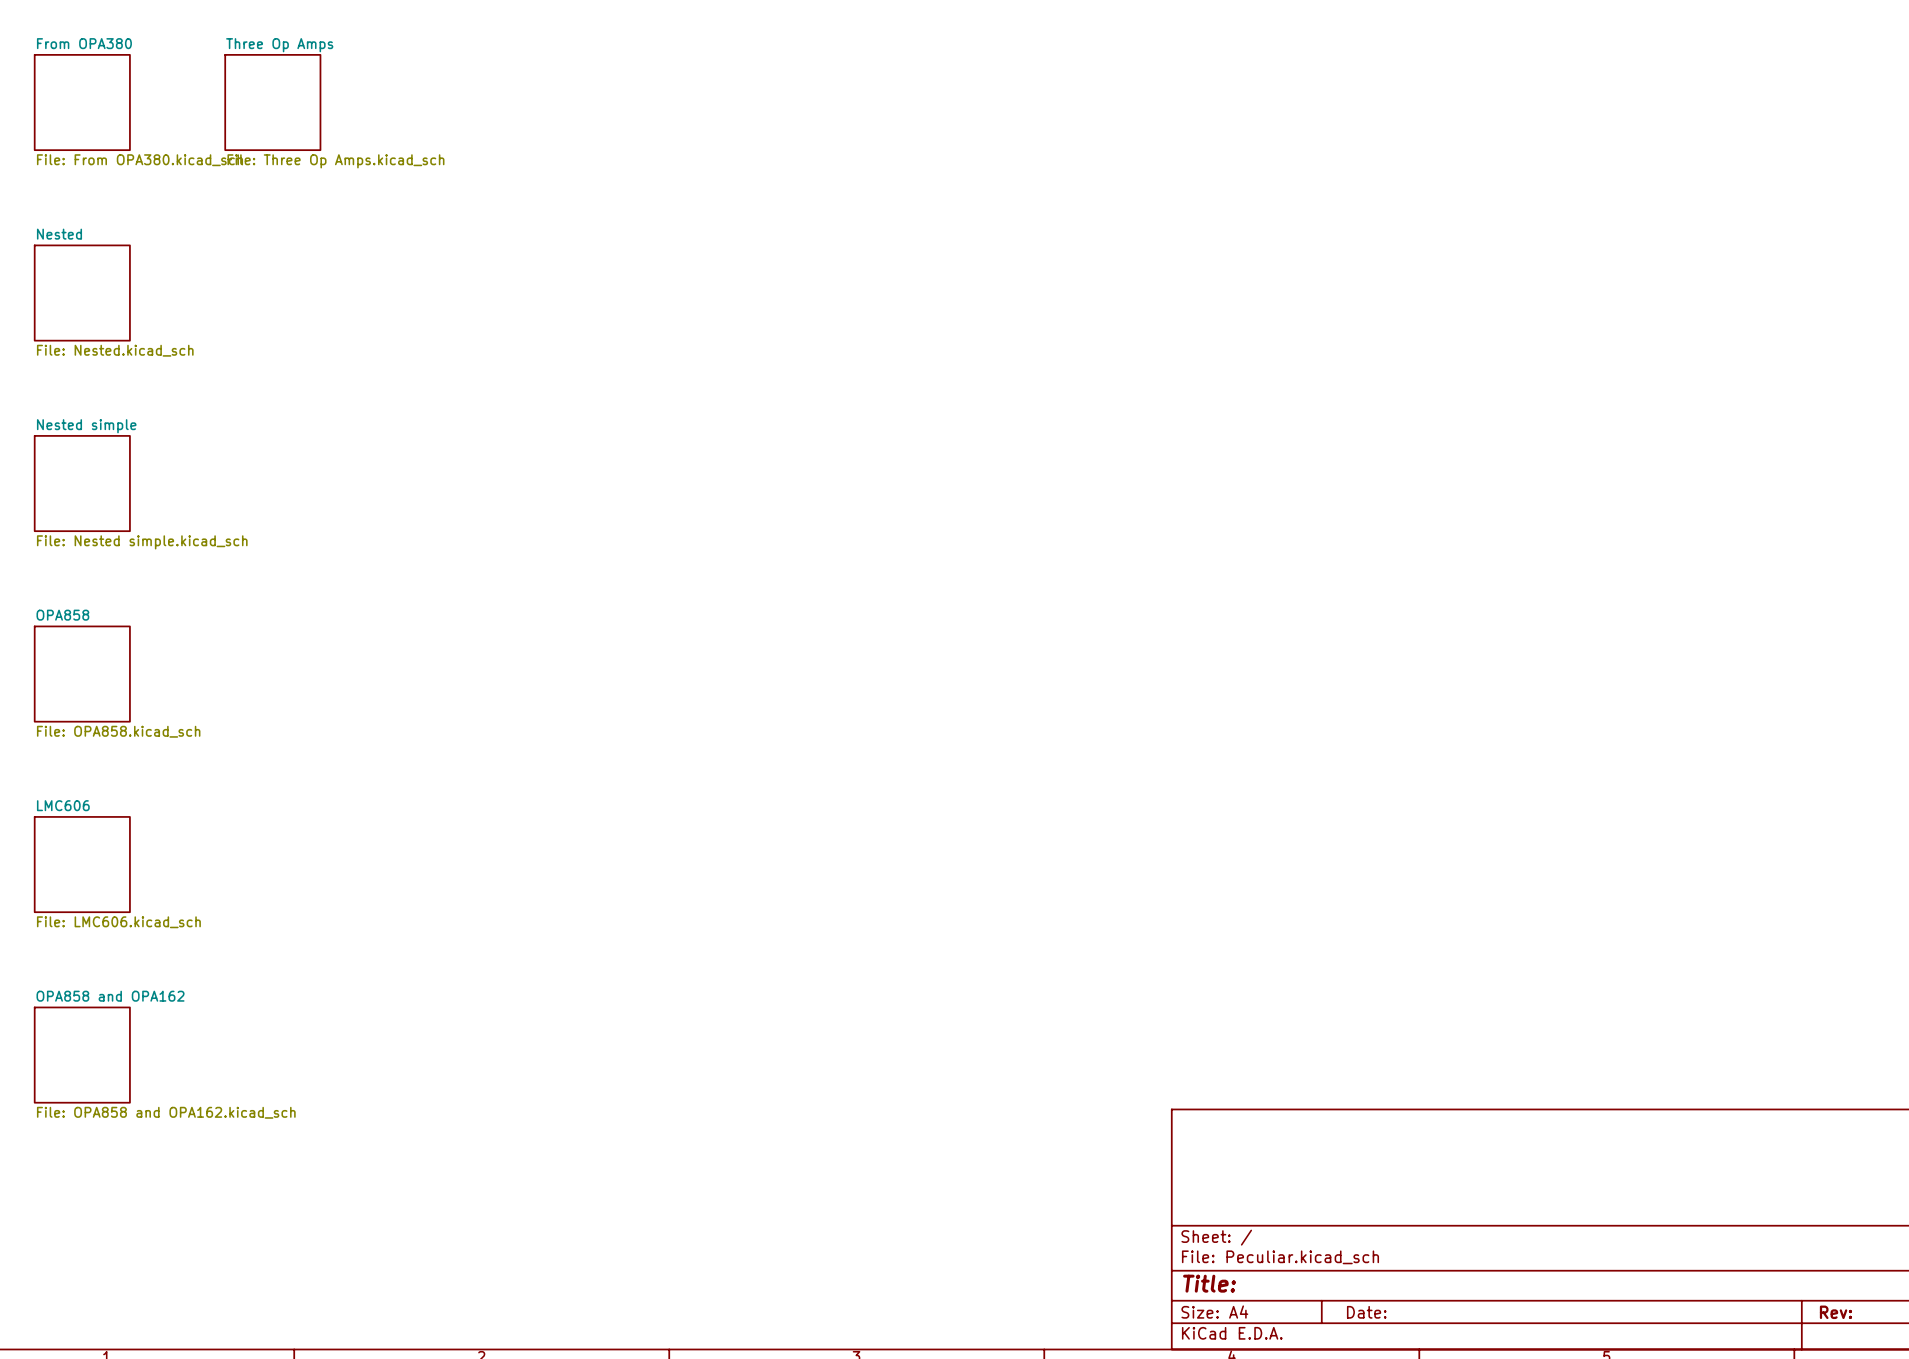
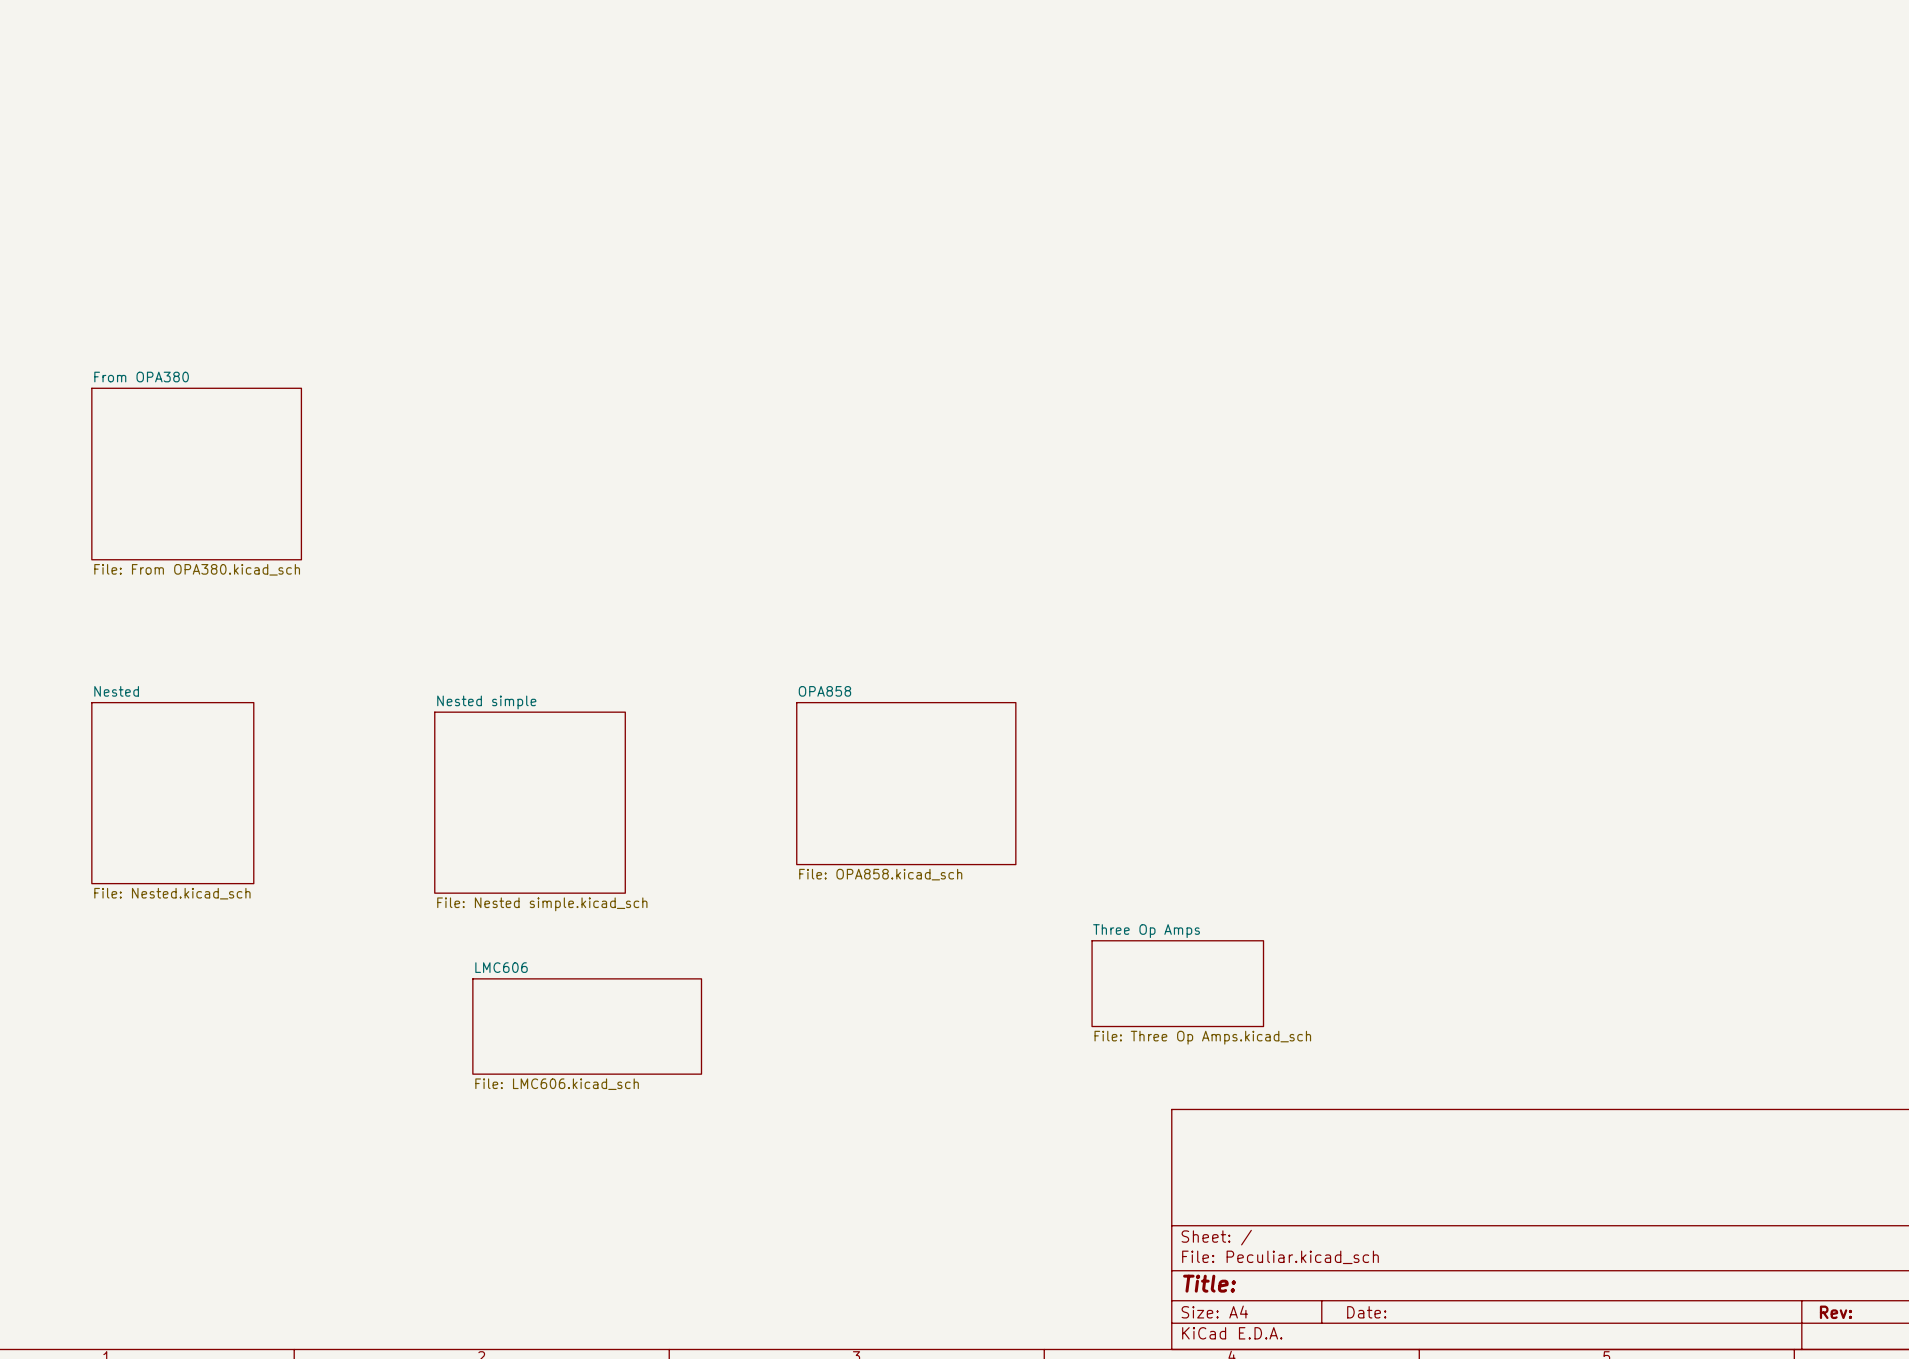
sheet From OPA380 name position: From OPA380 (84, 43) -> From OPA380 (141, 377)
sheet From OPA380 shape: [34, 54, 131, 151] -> [91, 387, 302, 561]
sheet Three Op Amps: File: Three Op Amps.kicad_sch (272, 102) -> none
sheet From OPA380 value position: File: From OPA380.kicad_sch (140, 160) -> File: From OPA380.kicad_sch (197, 569)
sheet Nested: File: Nested.kicad_sch (82, 293) -> none
sheet Nested simple: File: Nested simple.kicad_sch (82, 483) -> none
sheet OPA858 name position: OPA858 (62, 615) -> OPA858 (824, 691)
sheet OPA858 shape: [34, 625, 131, 723] -> [796, 702, 1017, 866]
sheet OPA858 value position: File: OPA858.kicad_sch (118, 731) -> File: OPA858.kicad_sch (880, 874)
sheet Nested: none -> File: Nested.kicad_sch (172, 793)
sheet Nested simple: none -> File: Nested simple.kicad_sch (530, 802)
sheet LMC606 name position: LMC606 (63, 805) -> LMC606 (501, 967)
sheet LMC606 shape: [34, 816, 131, 913] -> [472, 978, 703, 1075]
sheet LMC606 value position: File: LMC606.kicad_sch (118, 922) -> File: LMC606.kicad_sch (557, 1084)
sheet Three Op Amps: none -> File: Three Op Amps.kicad_sch (1177, 983)
sheet OPA858 and OPA162: File: OPA858 and OPA162.kicad_sch (82, 1055) -> none

